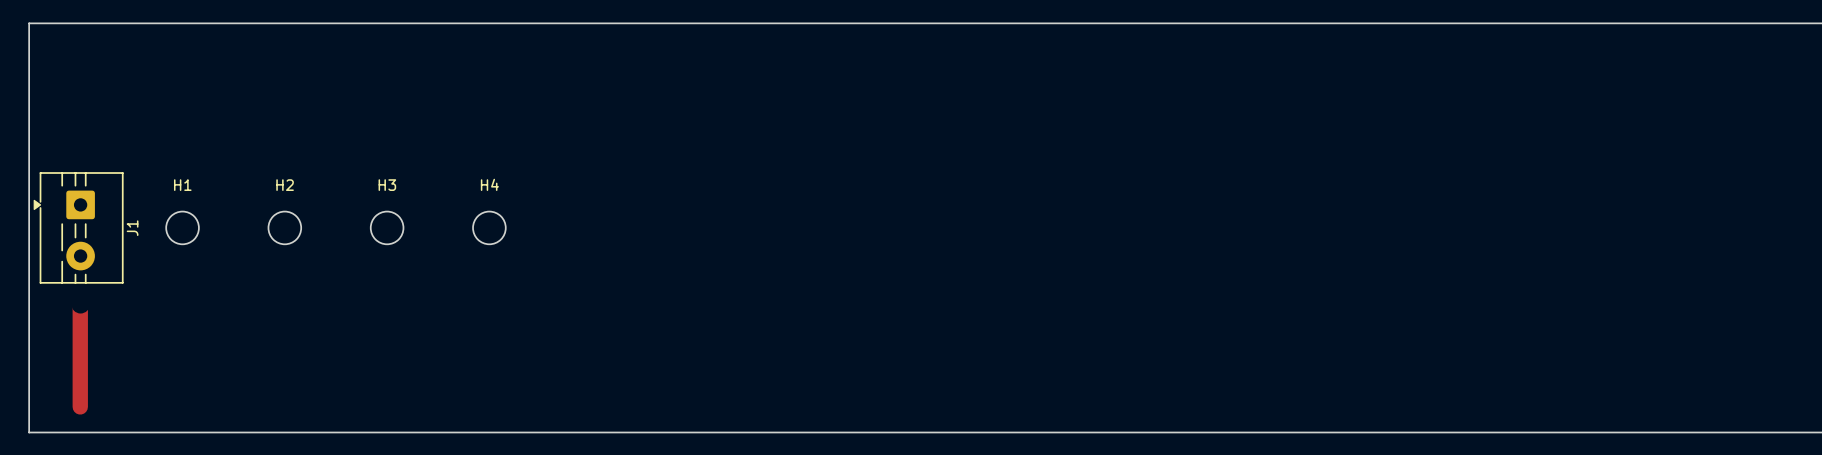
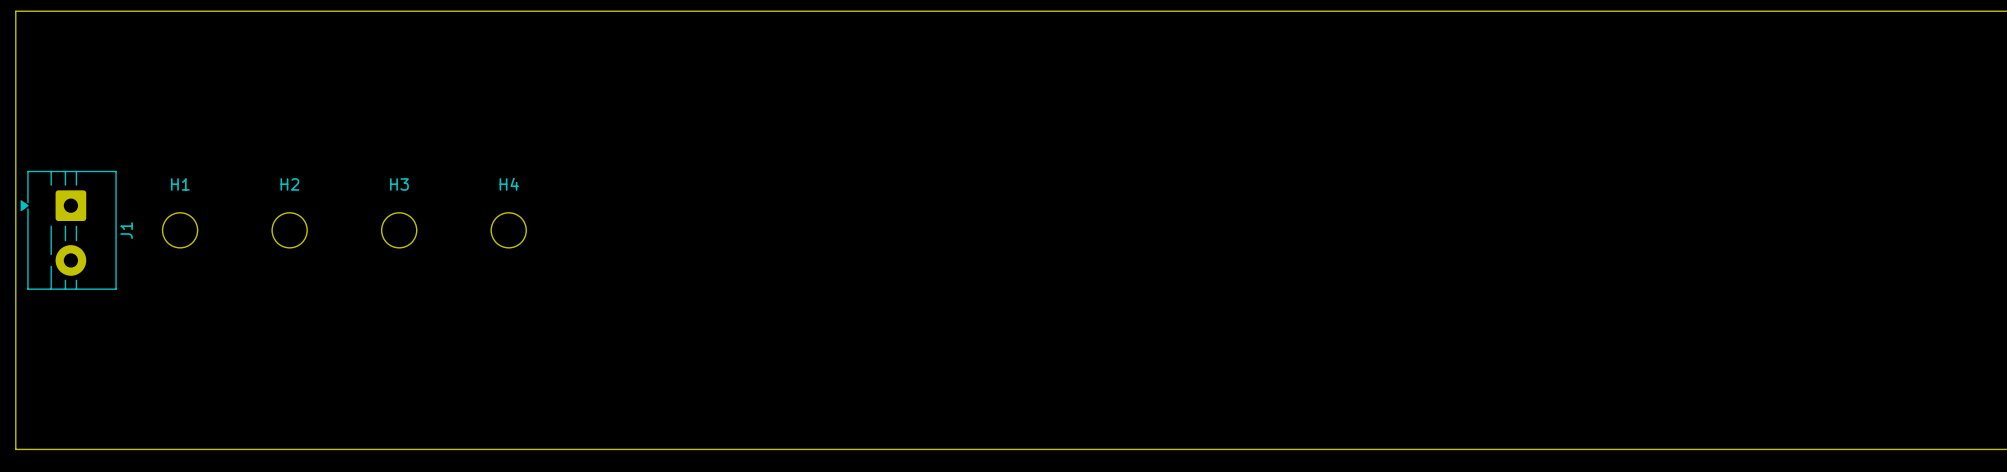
track: (80, 304) (80, 406) -> none
via: (80, 304) -> none

